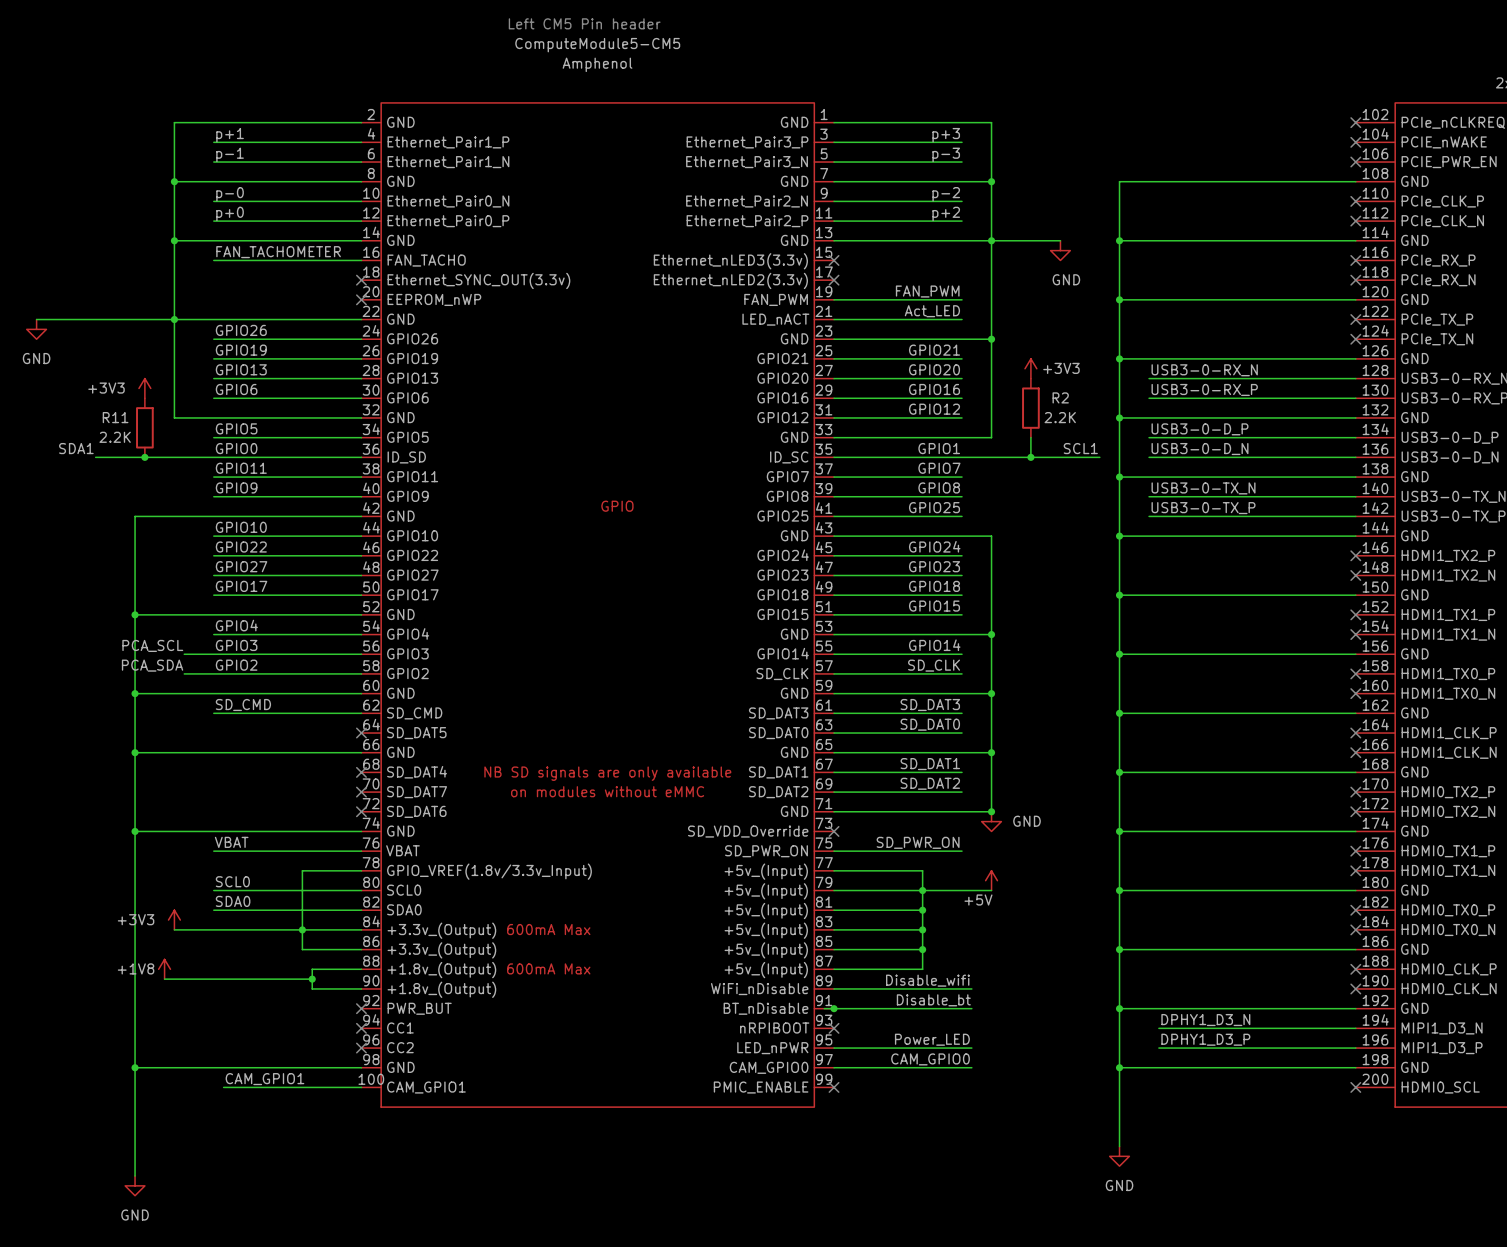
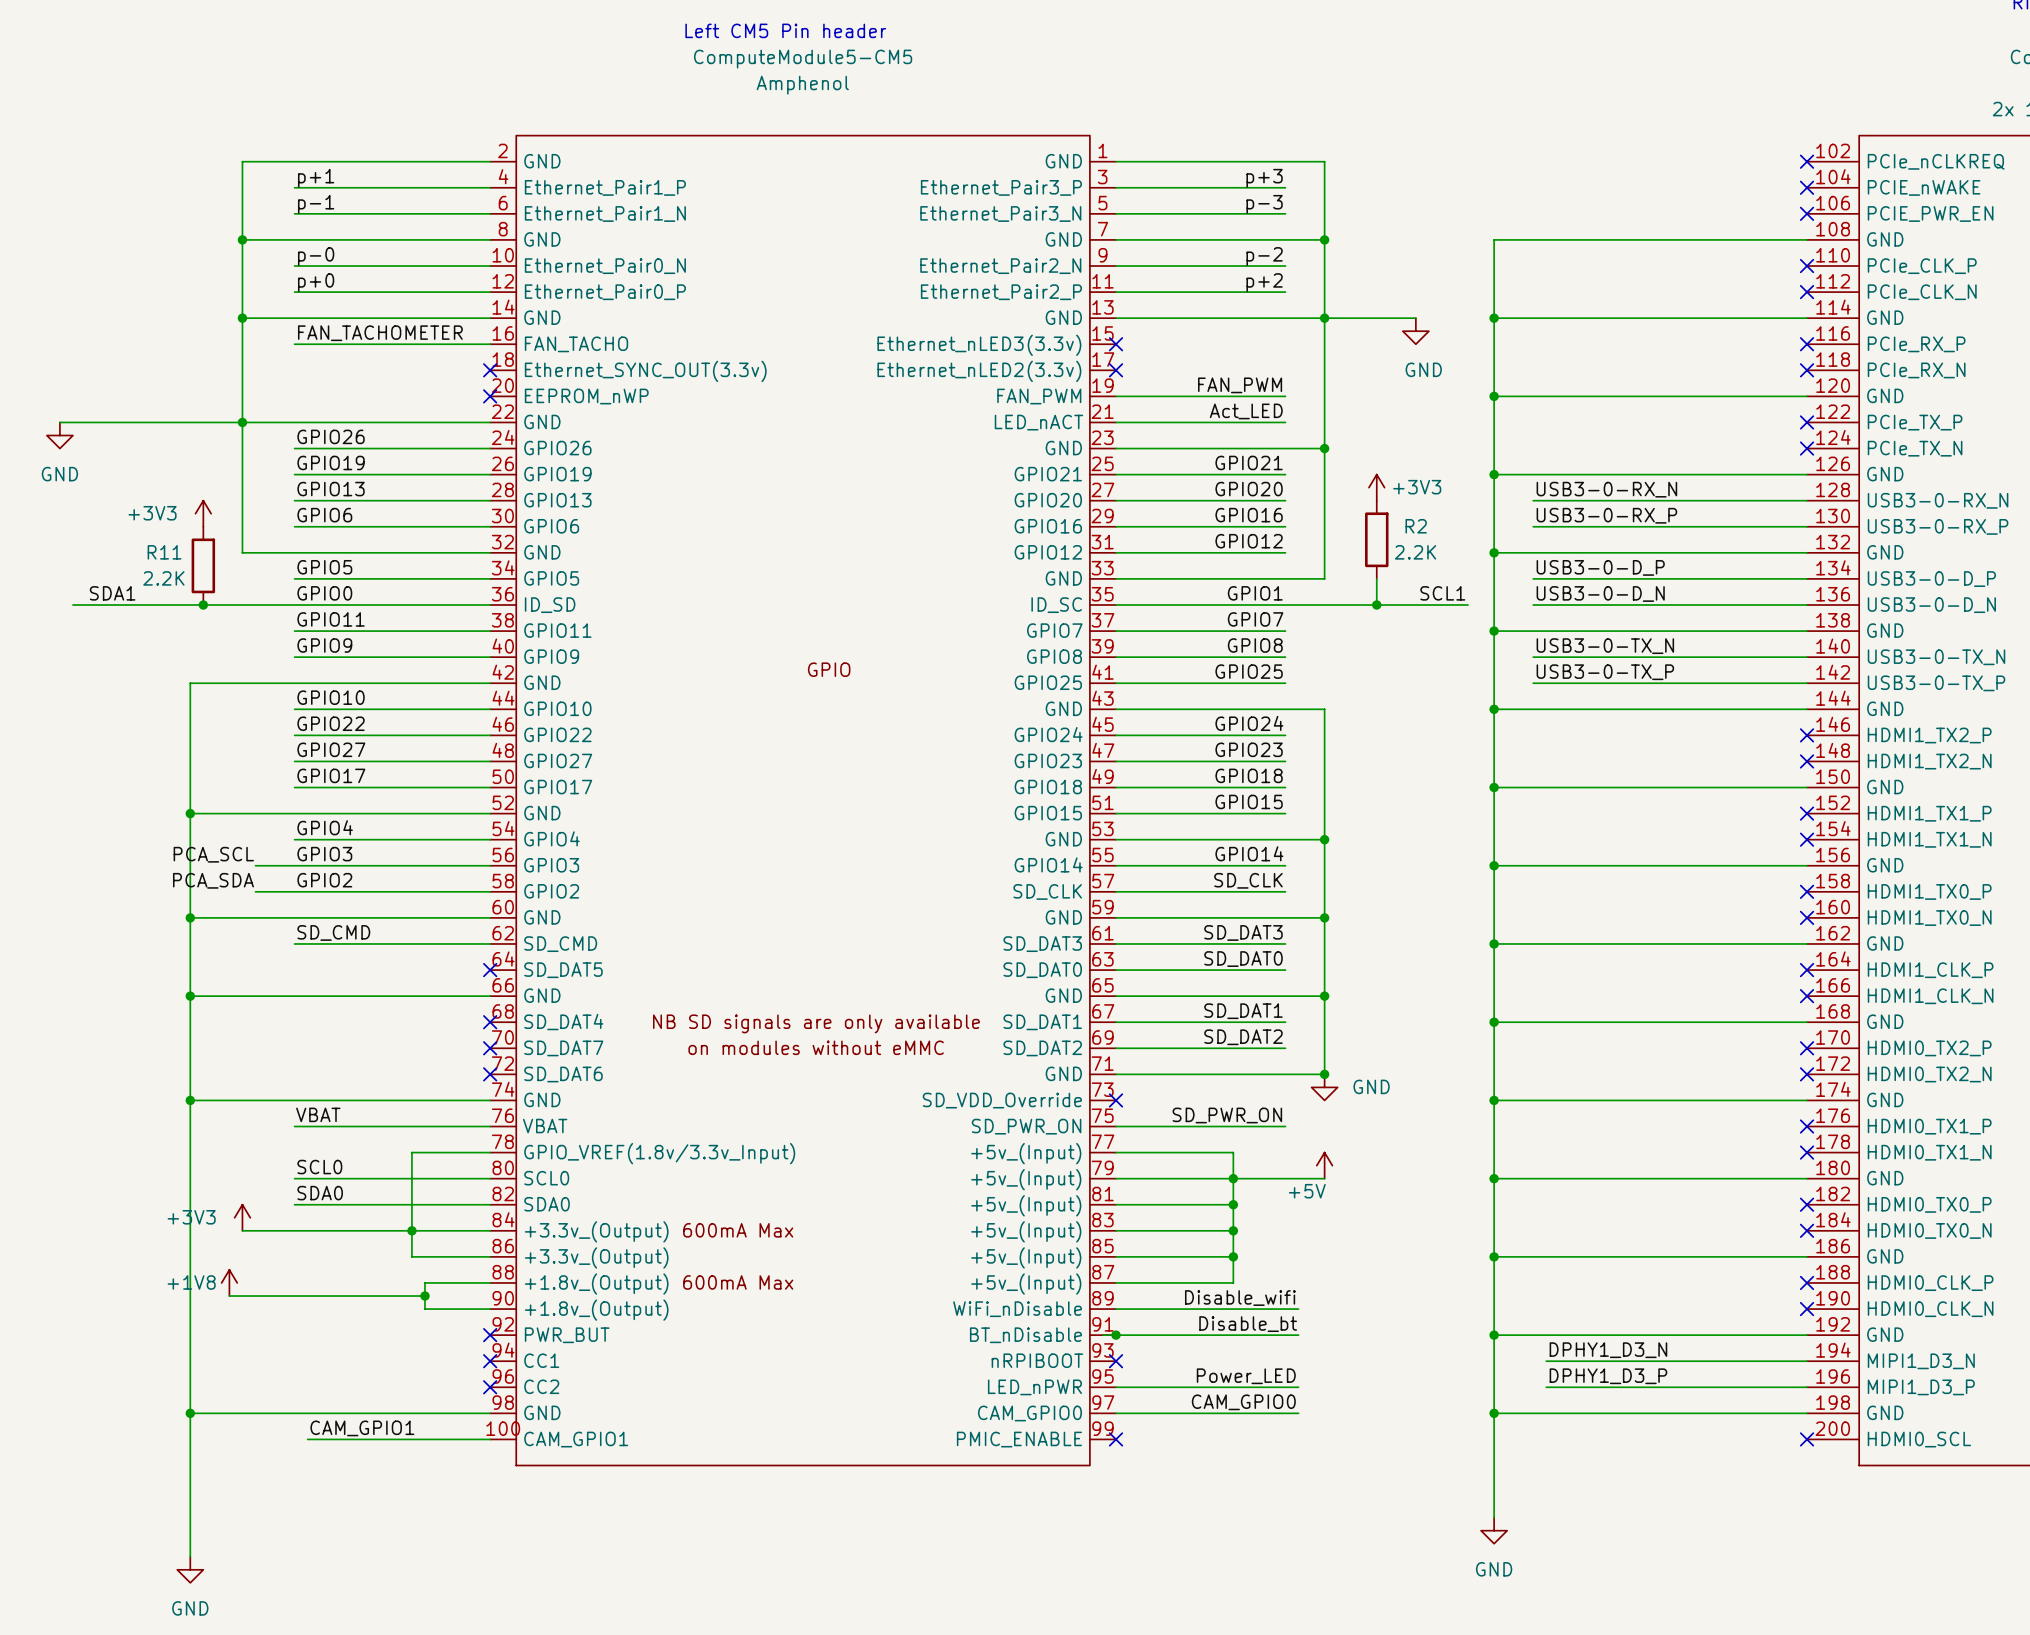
wire: none -> (72, 604) (138, 604)

